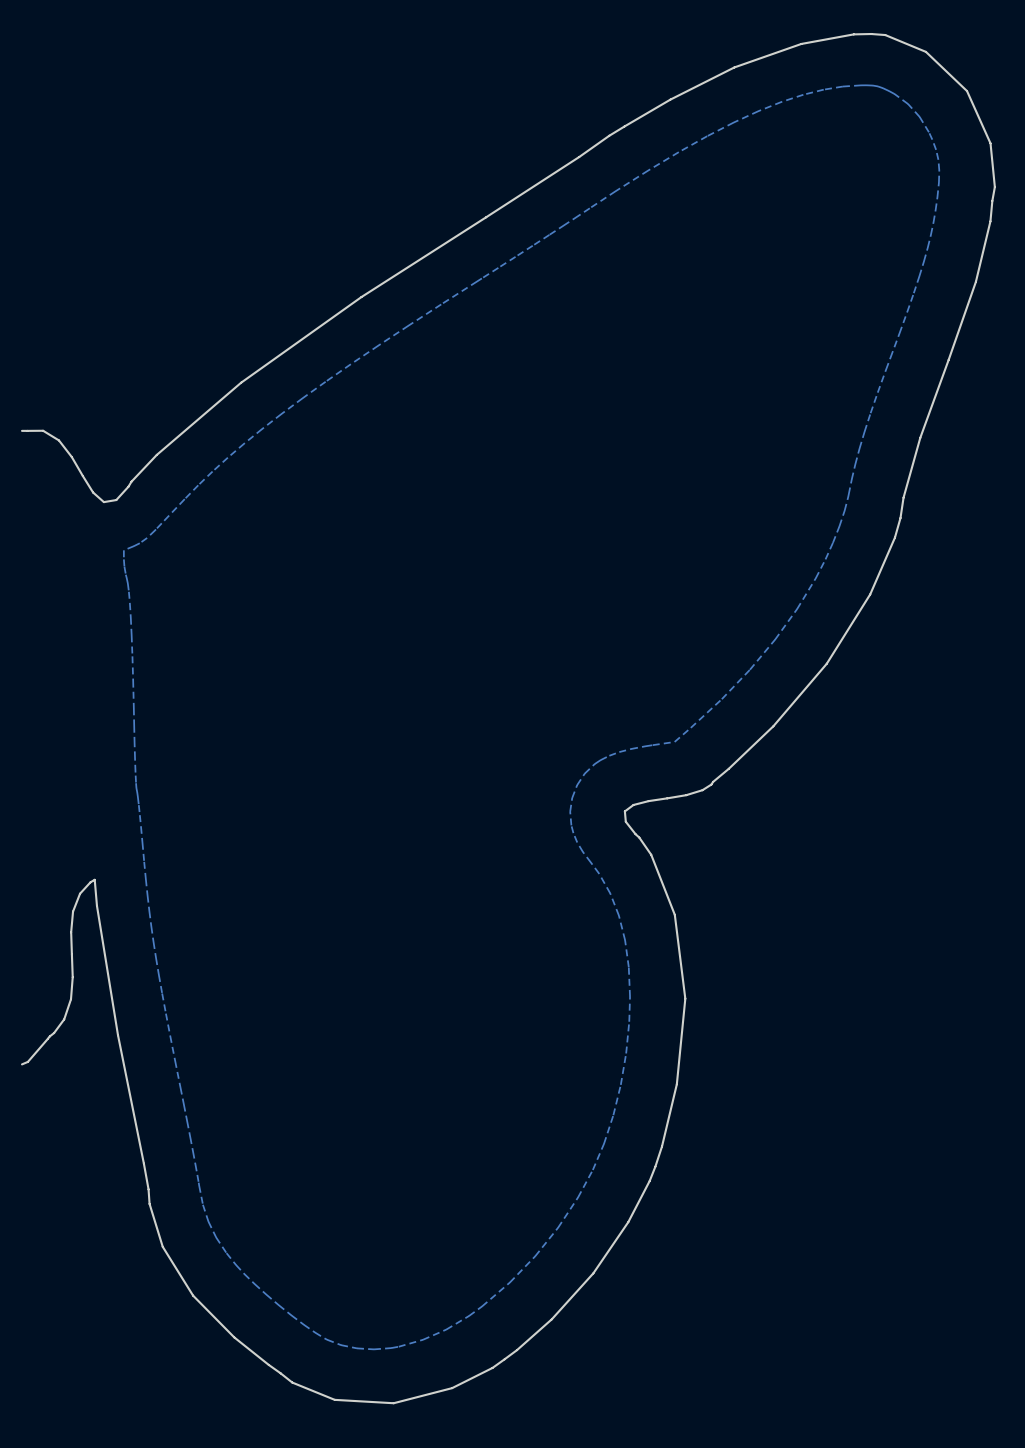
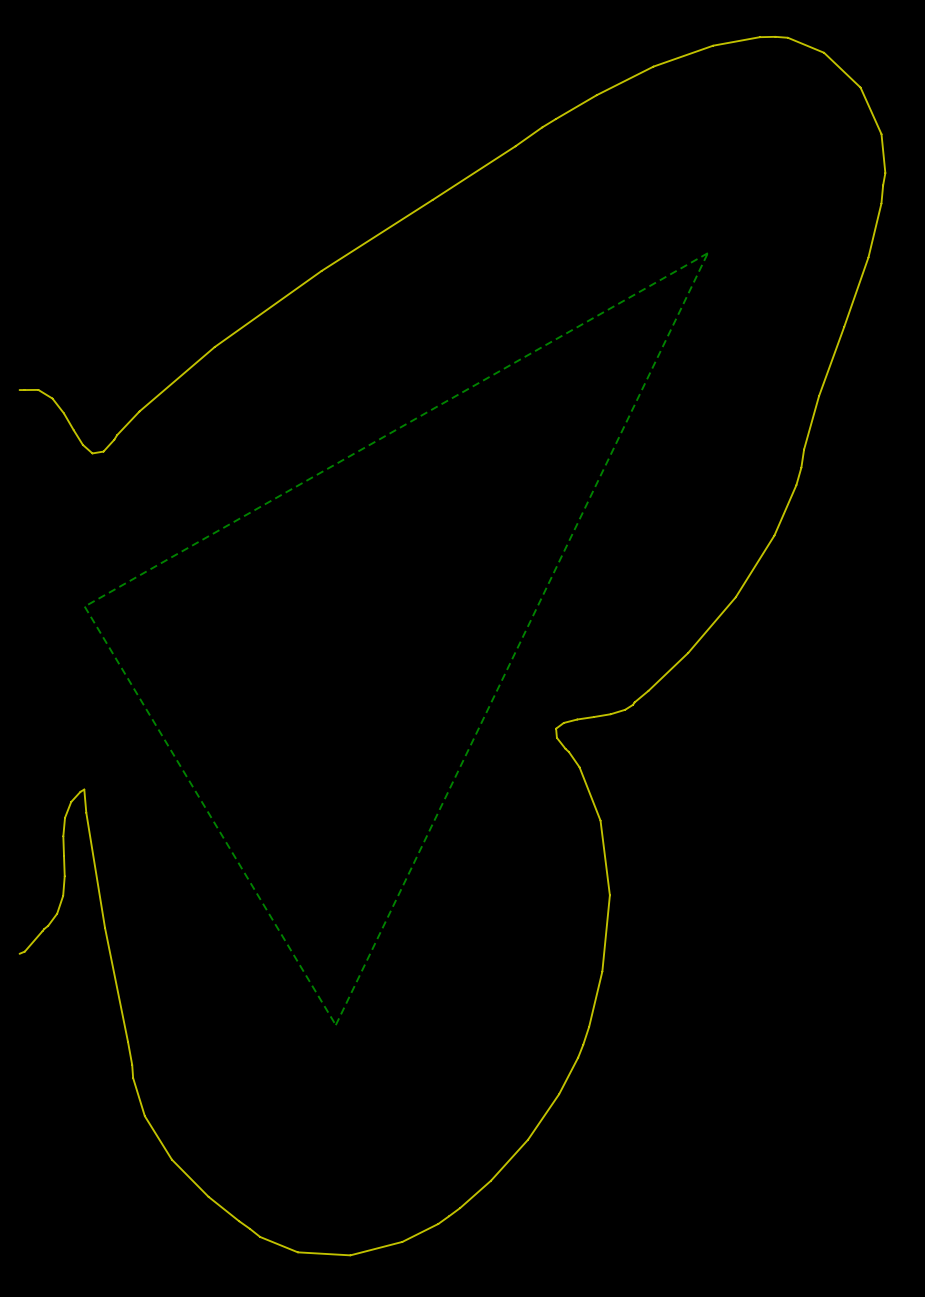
zone outline: (866, 85) (877, 86) (894, 94) (908, 104) (919, 116) (936, 149) (938, 182) (933, 222) (924, 261) (864, 431) (844, 510) (833, 542) (815, 578) (797, 609) (750, 669) (721, 699) (674, 741) (631, 749) (600, 760) (584, 773) (572, 798) (570, 811) (573, 833) (582, 852) (599, 873) (610, 893) (618, 915) (628, 967) (629, 1021) (620, 1084) (604, 1143) (592, 1169) (558, 1227) (535, 1256) (509, 1282) (469, 1315) (446, 1329) (422, 1339) (391, 1348) (357, 1348) (327, 1339) (278, 1305) (236, 1265) (216, 1237) (202, 1204) (162, 993) (149, 911) (136, 783) (130, 617) (123, 550) (147, 537) (227, 457) (302, 398) (408, 325) (648, 170) (733, 122) (781, 101) (823, 89) (866, 85) -> (707, 253) (335, 1025) (84, 606) (707, 253)

